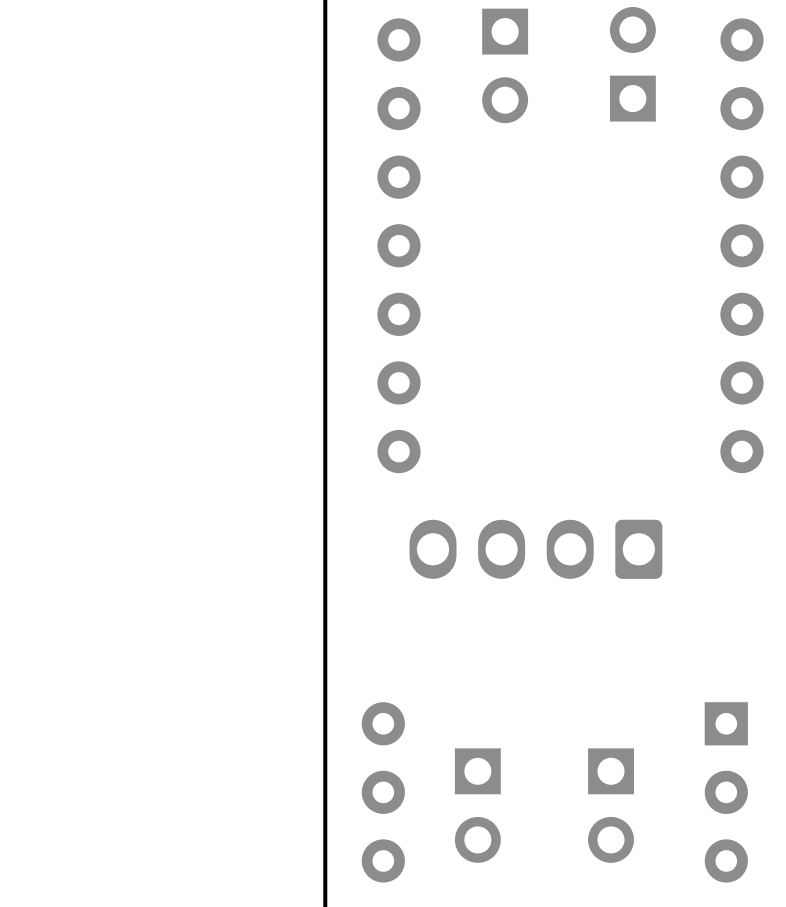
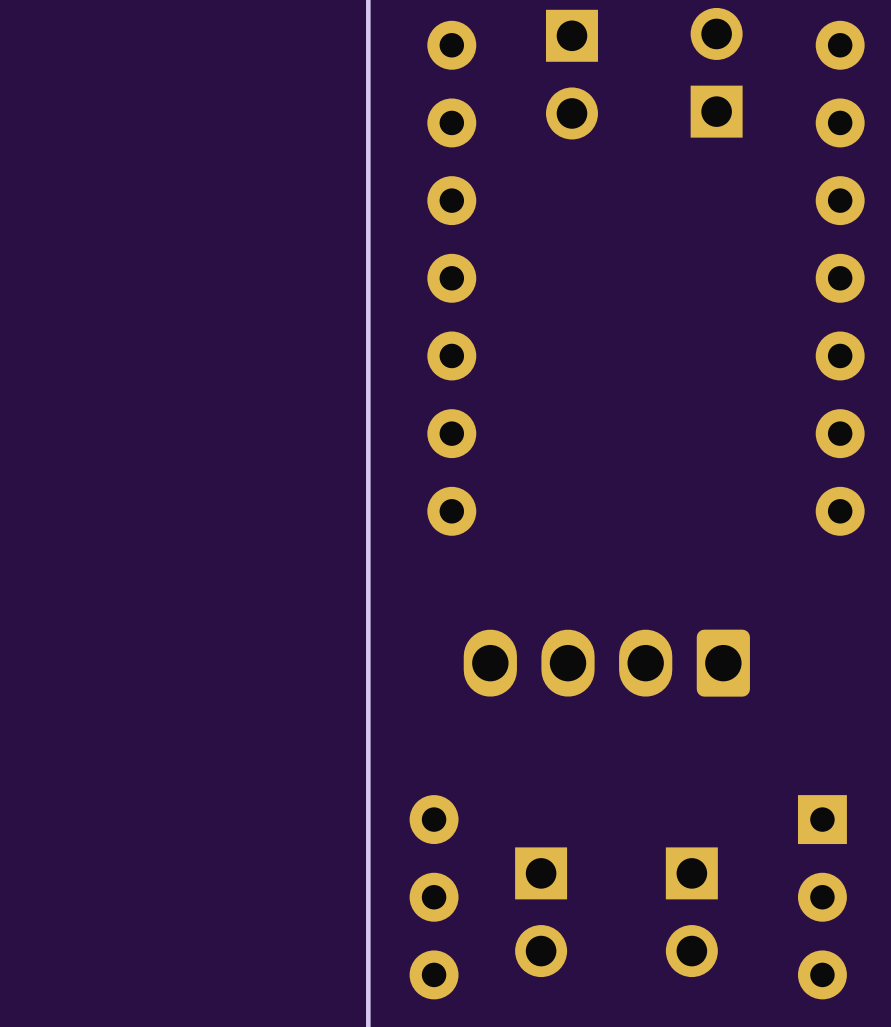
part position: (535, 549) -> (606, 663)

